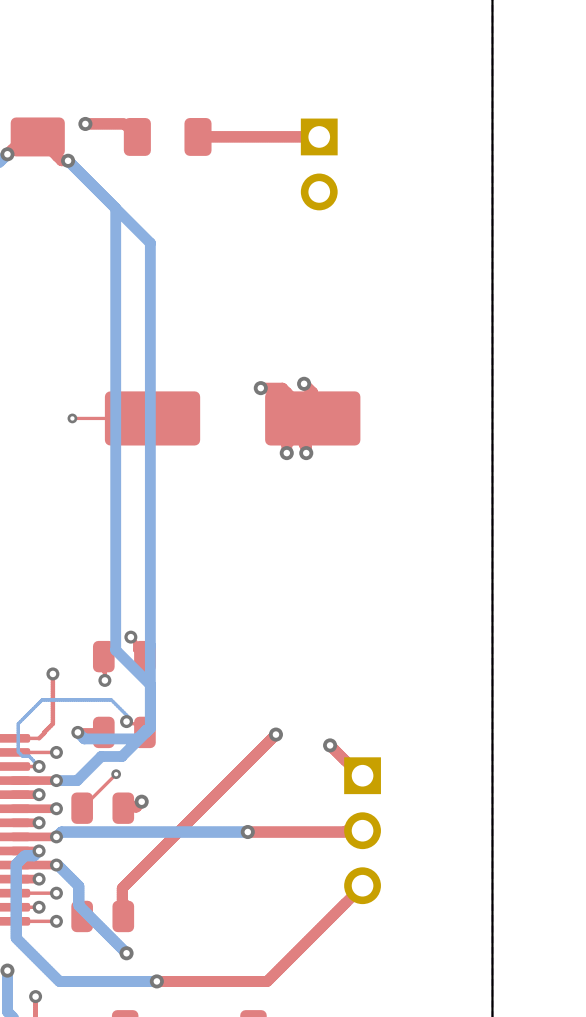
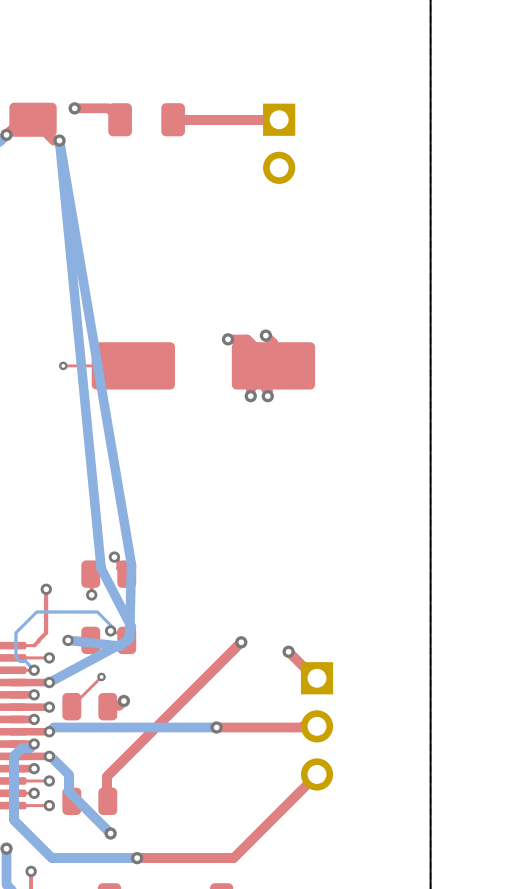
bottom track: (68, 160) (150, 243) (150, 728) (121, 756) (101, 756) (77, 780) (56, 780) -> none
bottom track: (115, 208) (115, 650) (150, 684) -> none
bottom track: (148, 730) (137, 738) (84, 738) (77, 732) -> (49, 682) (127, 640) (131, 627) (101, 568) (59, 140) (131, 564) (129, 638) (120, 646) (68, 640)

